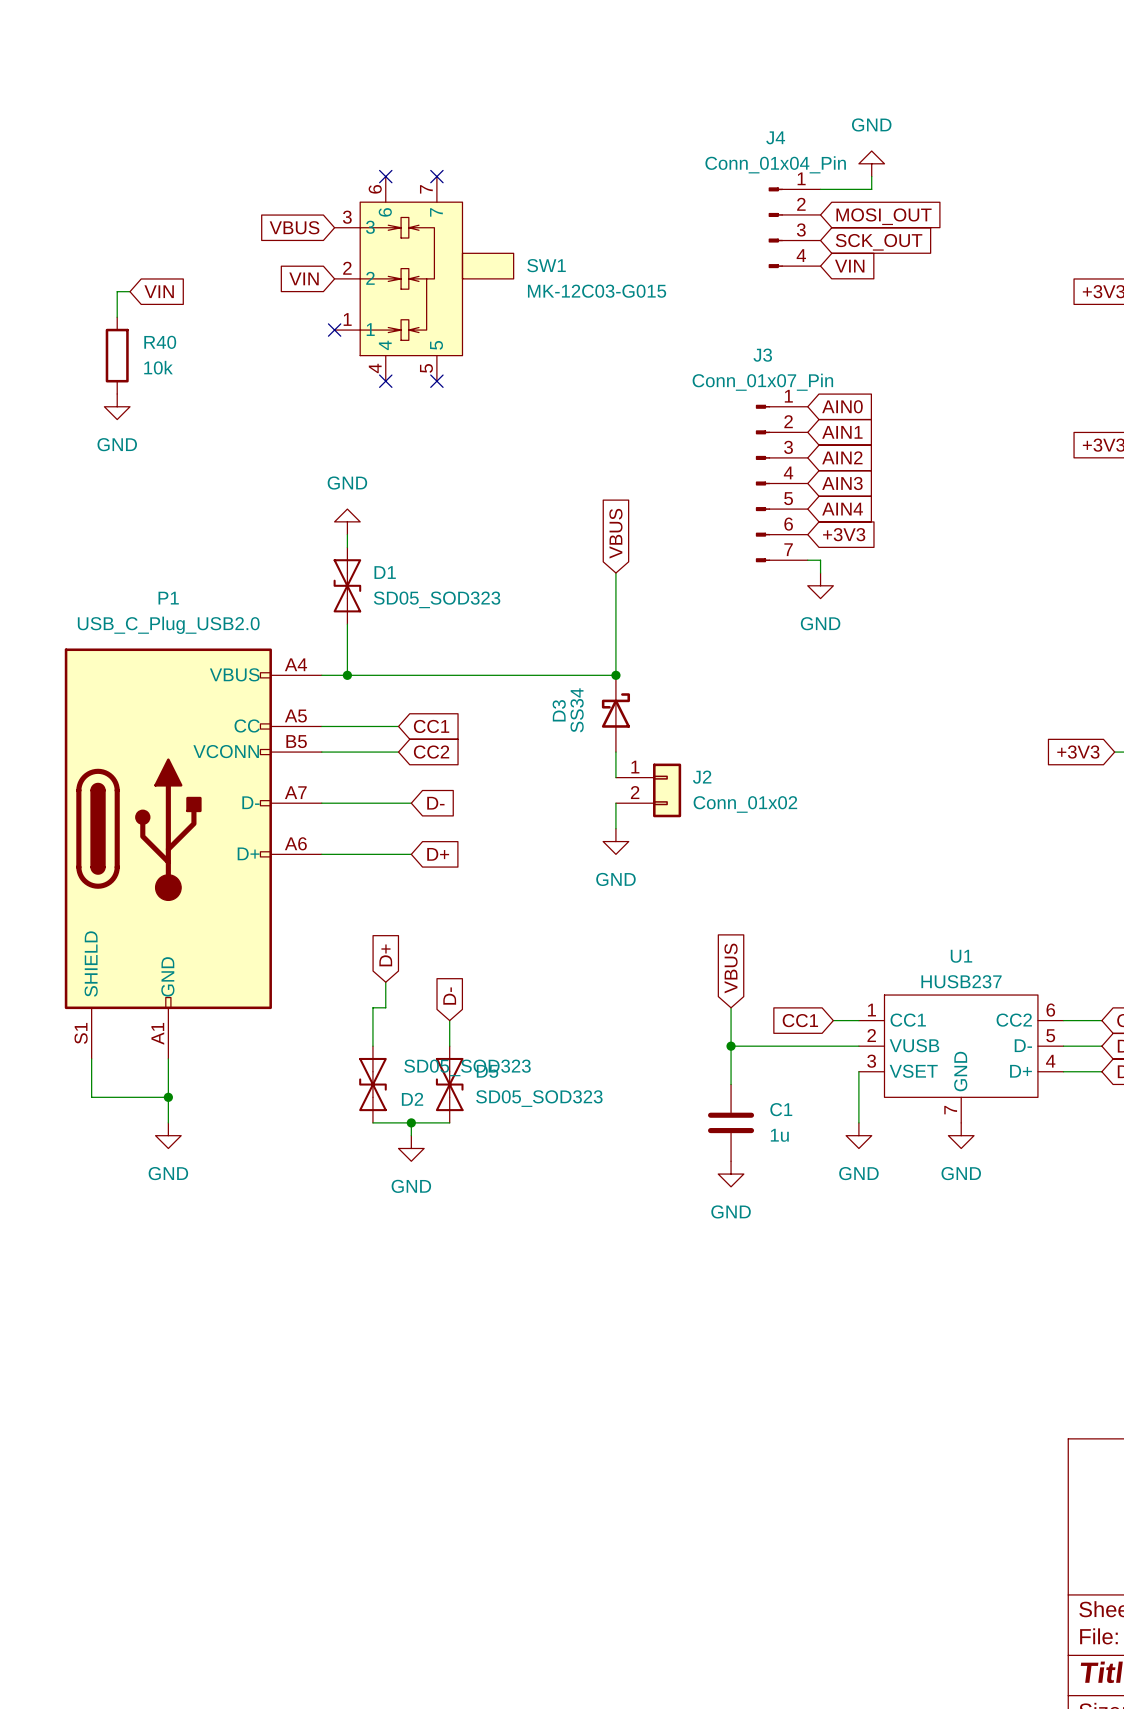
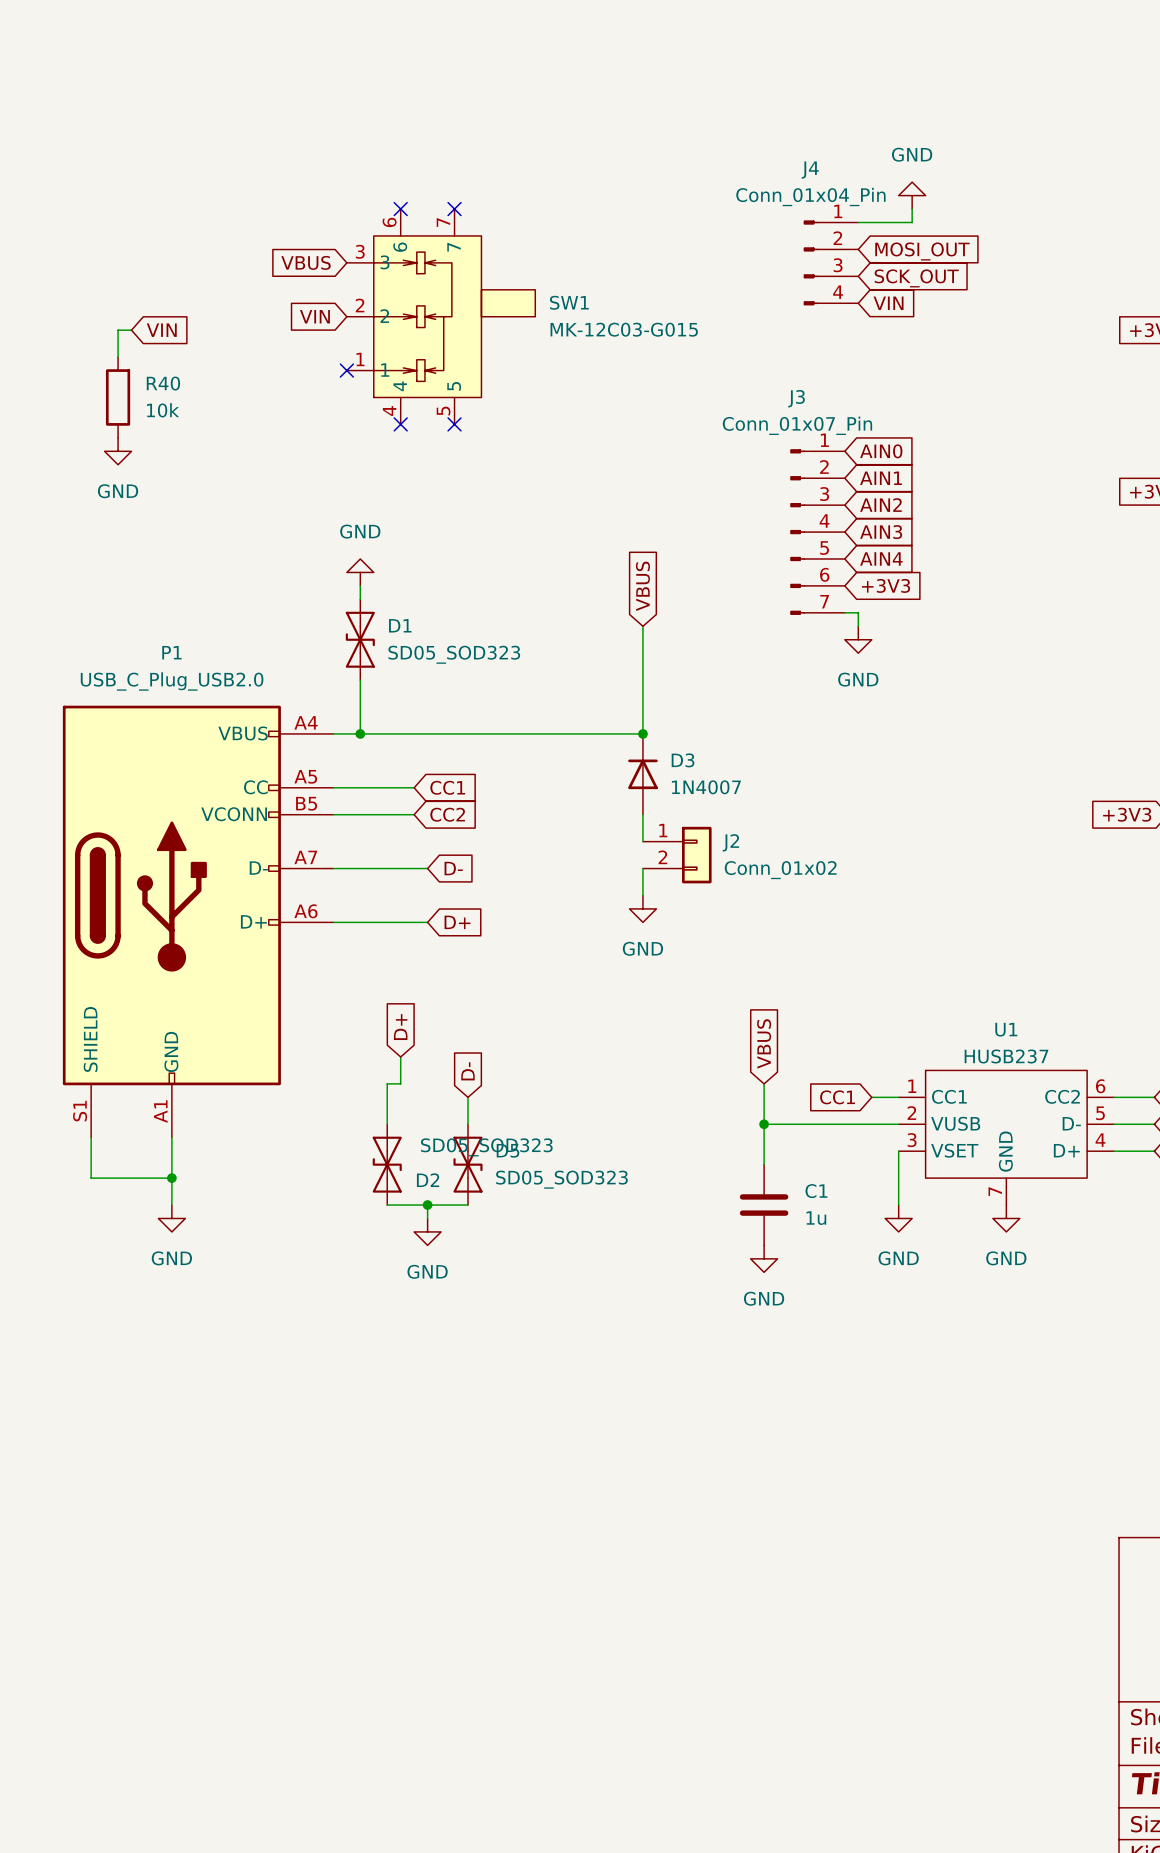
D3 symbol: [601, 675, 631, 753] -> [628, 733, 658, 815]
D3 name rotation: 0° (559, 710) -> 90° clockwise (683, 760)
D3 name position: D3 (559, 710) -> D3 (683, 760)
D3 value: SS34 (577, 710) -> 1N4007 (706, 787)

